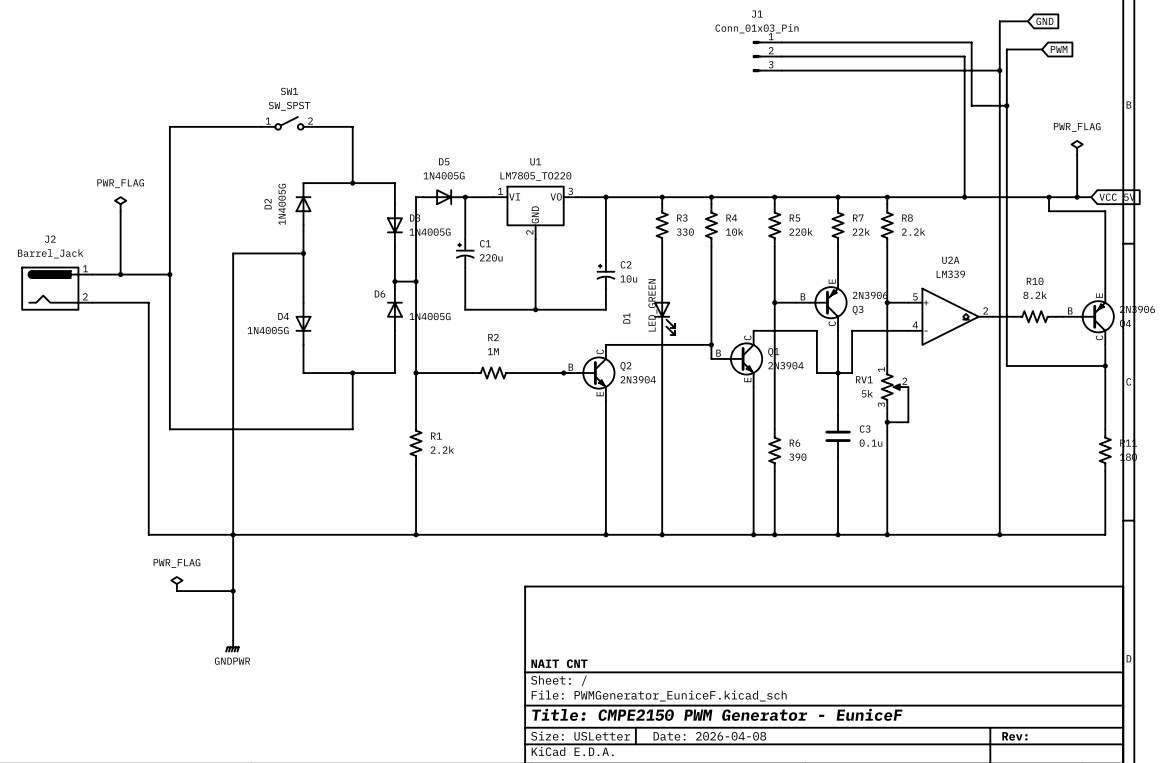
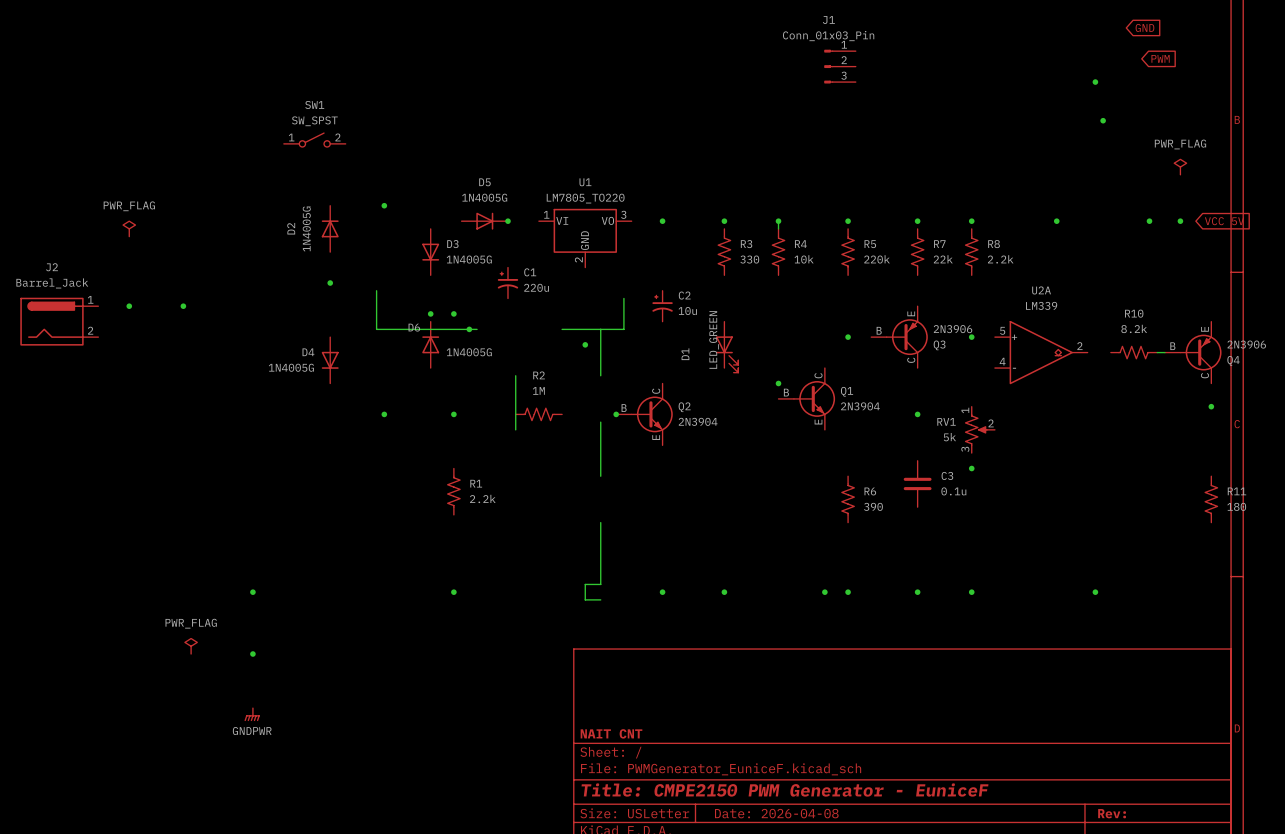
wire: (1027, 21) (999, 21) (999, 534) -> none
wire: (781, 42) (971, 42) (971, 105) (1006, 105) -> none
wire: (1041, 49) (1006, 49) (1006, 365) (1105, 365) -> none
wire: (781, 56) (964, 56) (964, 197) -> none
wire: (781, 70) (999, 70) -> none
wire: (261, 126) (169, 126) (169, 429) (352, 429) (352, 373) -> none
wire: (317, 126) (352, 126) (352, 183) -> none
wire: (1077, 154) (1077, 197) -> none
wire: (303, 183) (394, 183) (394, 204) -> none
wire: (423, 197) (416, 197) (416, 422) -> none
wire: (493, 197) (465, 197) (465, 239) -> none
wire: (577, 197) (1091, 197) -> none
wire: (605, 197) (605, 260) -> none
wire: (662, 197) (662, 204) -> none
wire: (774, 197) (774, 204) -> none
wire: (838, 197) (838, 204) -> none
wire: (887, 197) (887, 204) -> none
wire: (1049, 197) (1049, 211) (1105, 211) (1105, 288) -> none
wire: (120, 211) (120, 274) -> none
wire: (303, 225) (303, 302) -> none
wire: (535, 239) (535, 309) -> none
wire: (394, 246) (394, 288) -> none
wire: (662, 246) (662, 288) -> (600, 329) (600, 375)
wire: (711, 246) (711, 358) -> none
wire: (774, 246) (774, 429) -> none
wire: (838, 246) (838, 274) -> none
wire: (887, 246) (887, 365) -> none
wire: (303, 253) (233, 253) (233, 640) -> none
wire: none -> (376, 290) (376, 329) (477, 329)
wire: (465, 267) (465, 309) (605, 309) (605, 288) -> none
wire: none -> (623, 298) (623, 329) (562, 329)
wire: (92, 274) (169, 274) -> none
wire: (394, 281) (416, 281) -> none
junction: none -> (469, 329)
wire: (92, 302) (148, 302) (148, 534) (1105, 534) (1105, 471) -> none
wire: (774, 302) (795, 302) -> none
wire: (887, 302) (908, 302) -> none
wire: (992, 316) (1013, 316) -> none
wire: (394, 330) (394, 373) (303, 373) (303, 344) -> none
wire: (662, 330) (662, 534) -> none
wire: (753, 330) (816, 330) (816, 373) (852, 373) (852, 330) (908, 330) -> none
wire: (838, 330) (838, 415) -> none
wire: none -> (515, 375) (515, 429)
wire: (605, 344) (711, 344) -> none
wire: (1105, 344) (1105, 429) -> none
wire: (416, 373) (472, 373) -> none
wire: (514, 373) (570, 373) -> none
wire: none -> (600, 422) (600, 476)
wire: (753, 387) (753, 534) -> none
wire: (908, 387) (908, 422) (887, 422) -> none
wire: (605, 401) (605, 534) -> none
wire: (887, 408) (887, 534) -> none
wire: (838, 457) (838, 534) -> none
wire: (416, 464) (416, 534) -> none
wire: none -> (600, 522) (600, 584) (585, 584) (585, 599) (600, 599)
wire: (774, 471) (774, 534) -> none
wire: (176, 591) (233, 591) -> none

